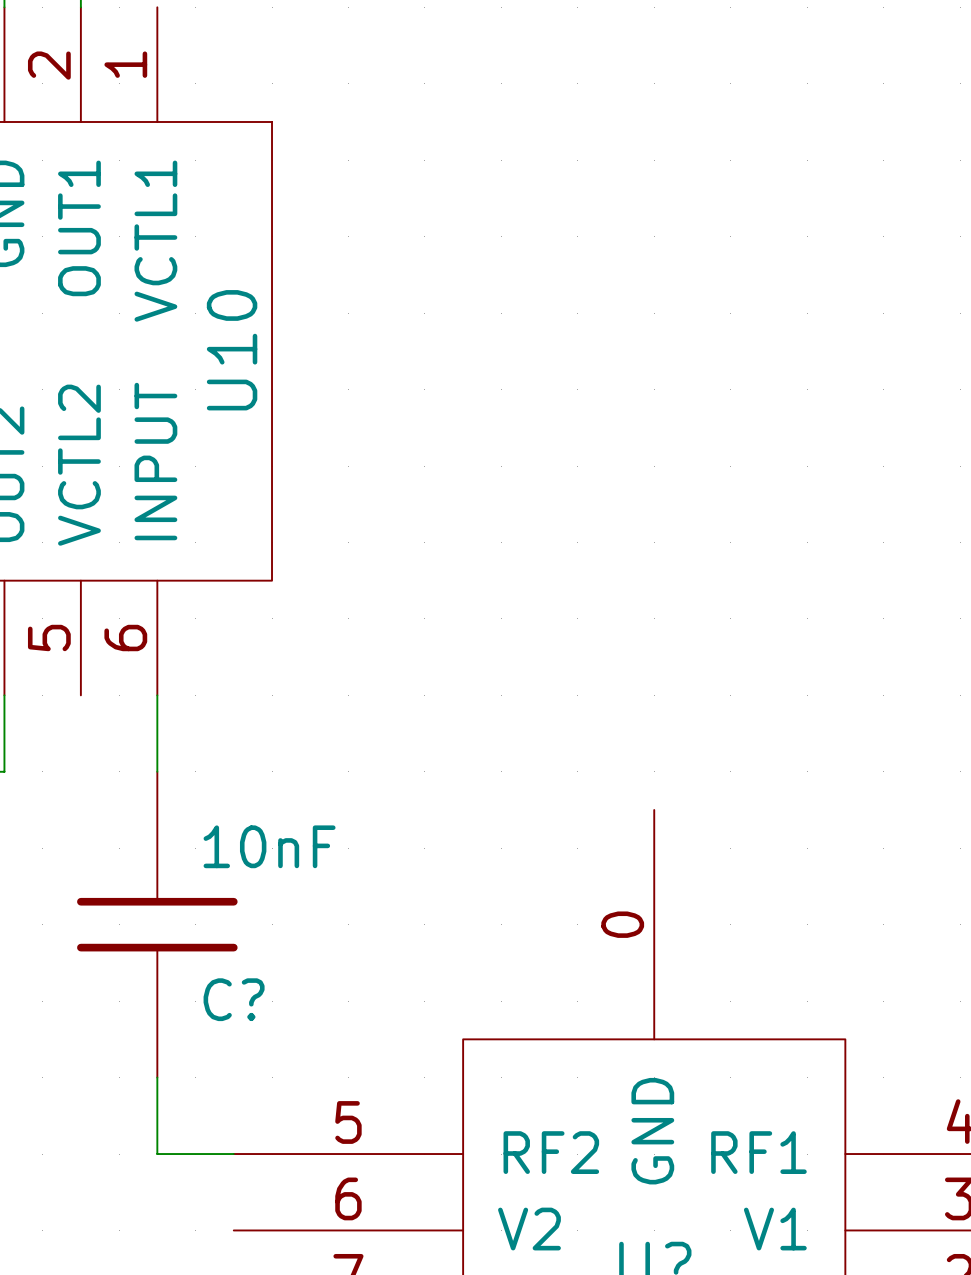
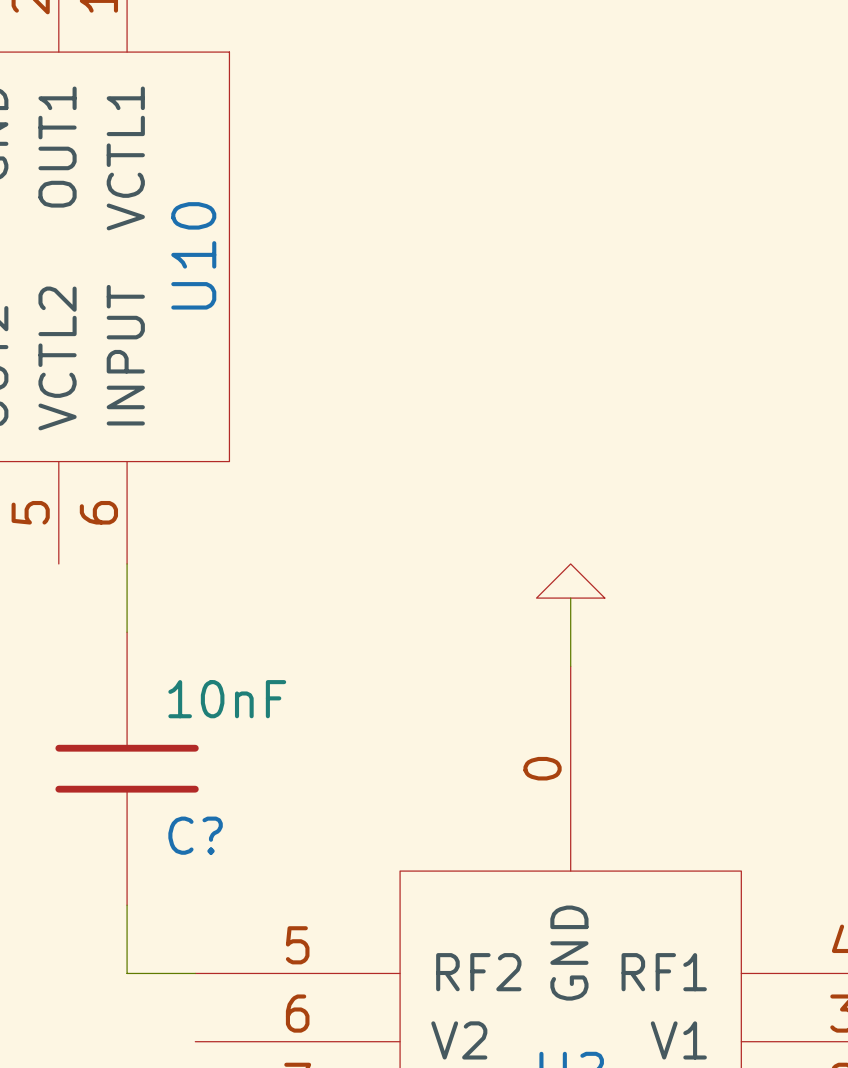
power symbol: none -> (570, 581)
wire: none -> (570, 598) (570, 666)

